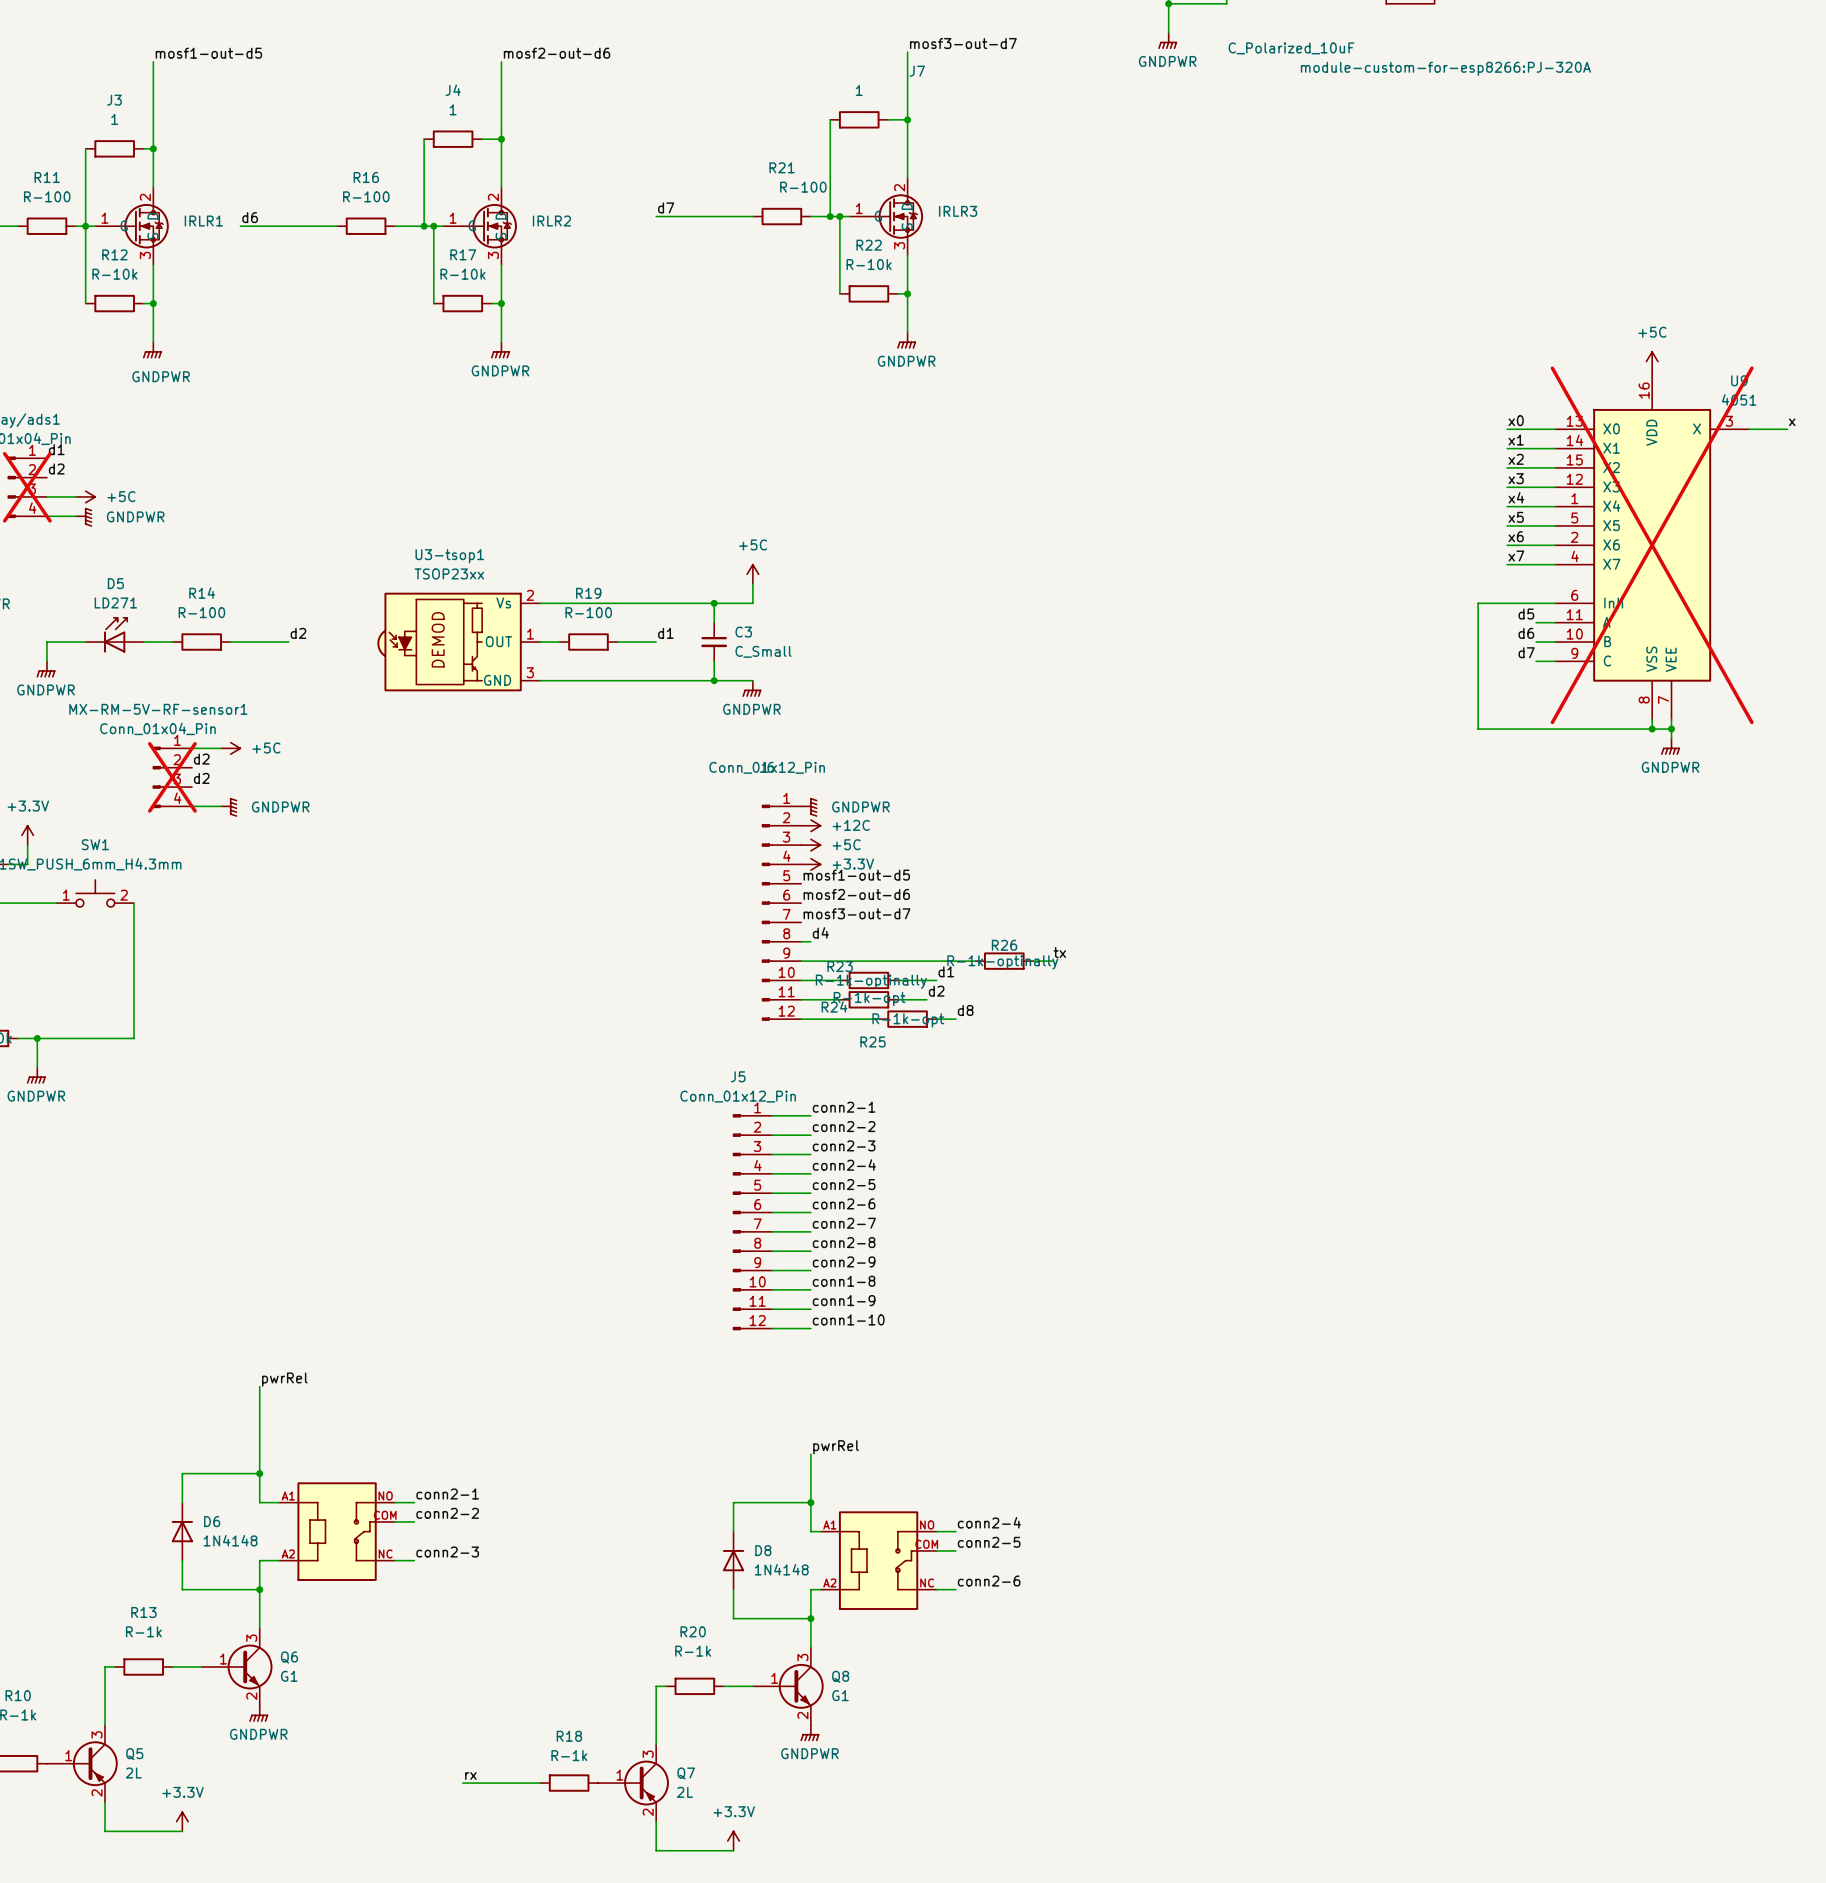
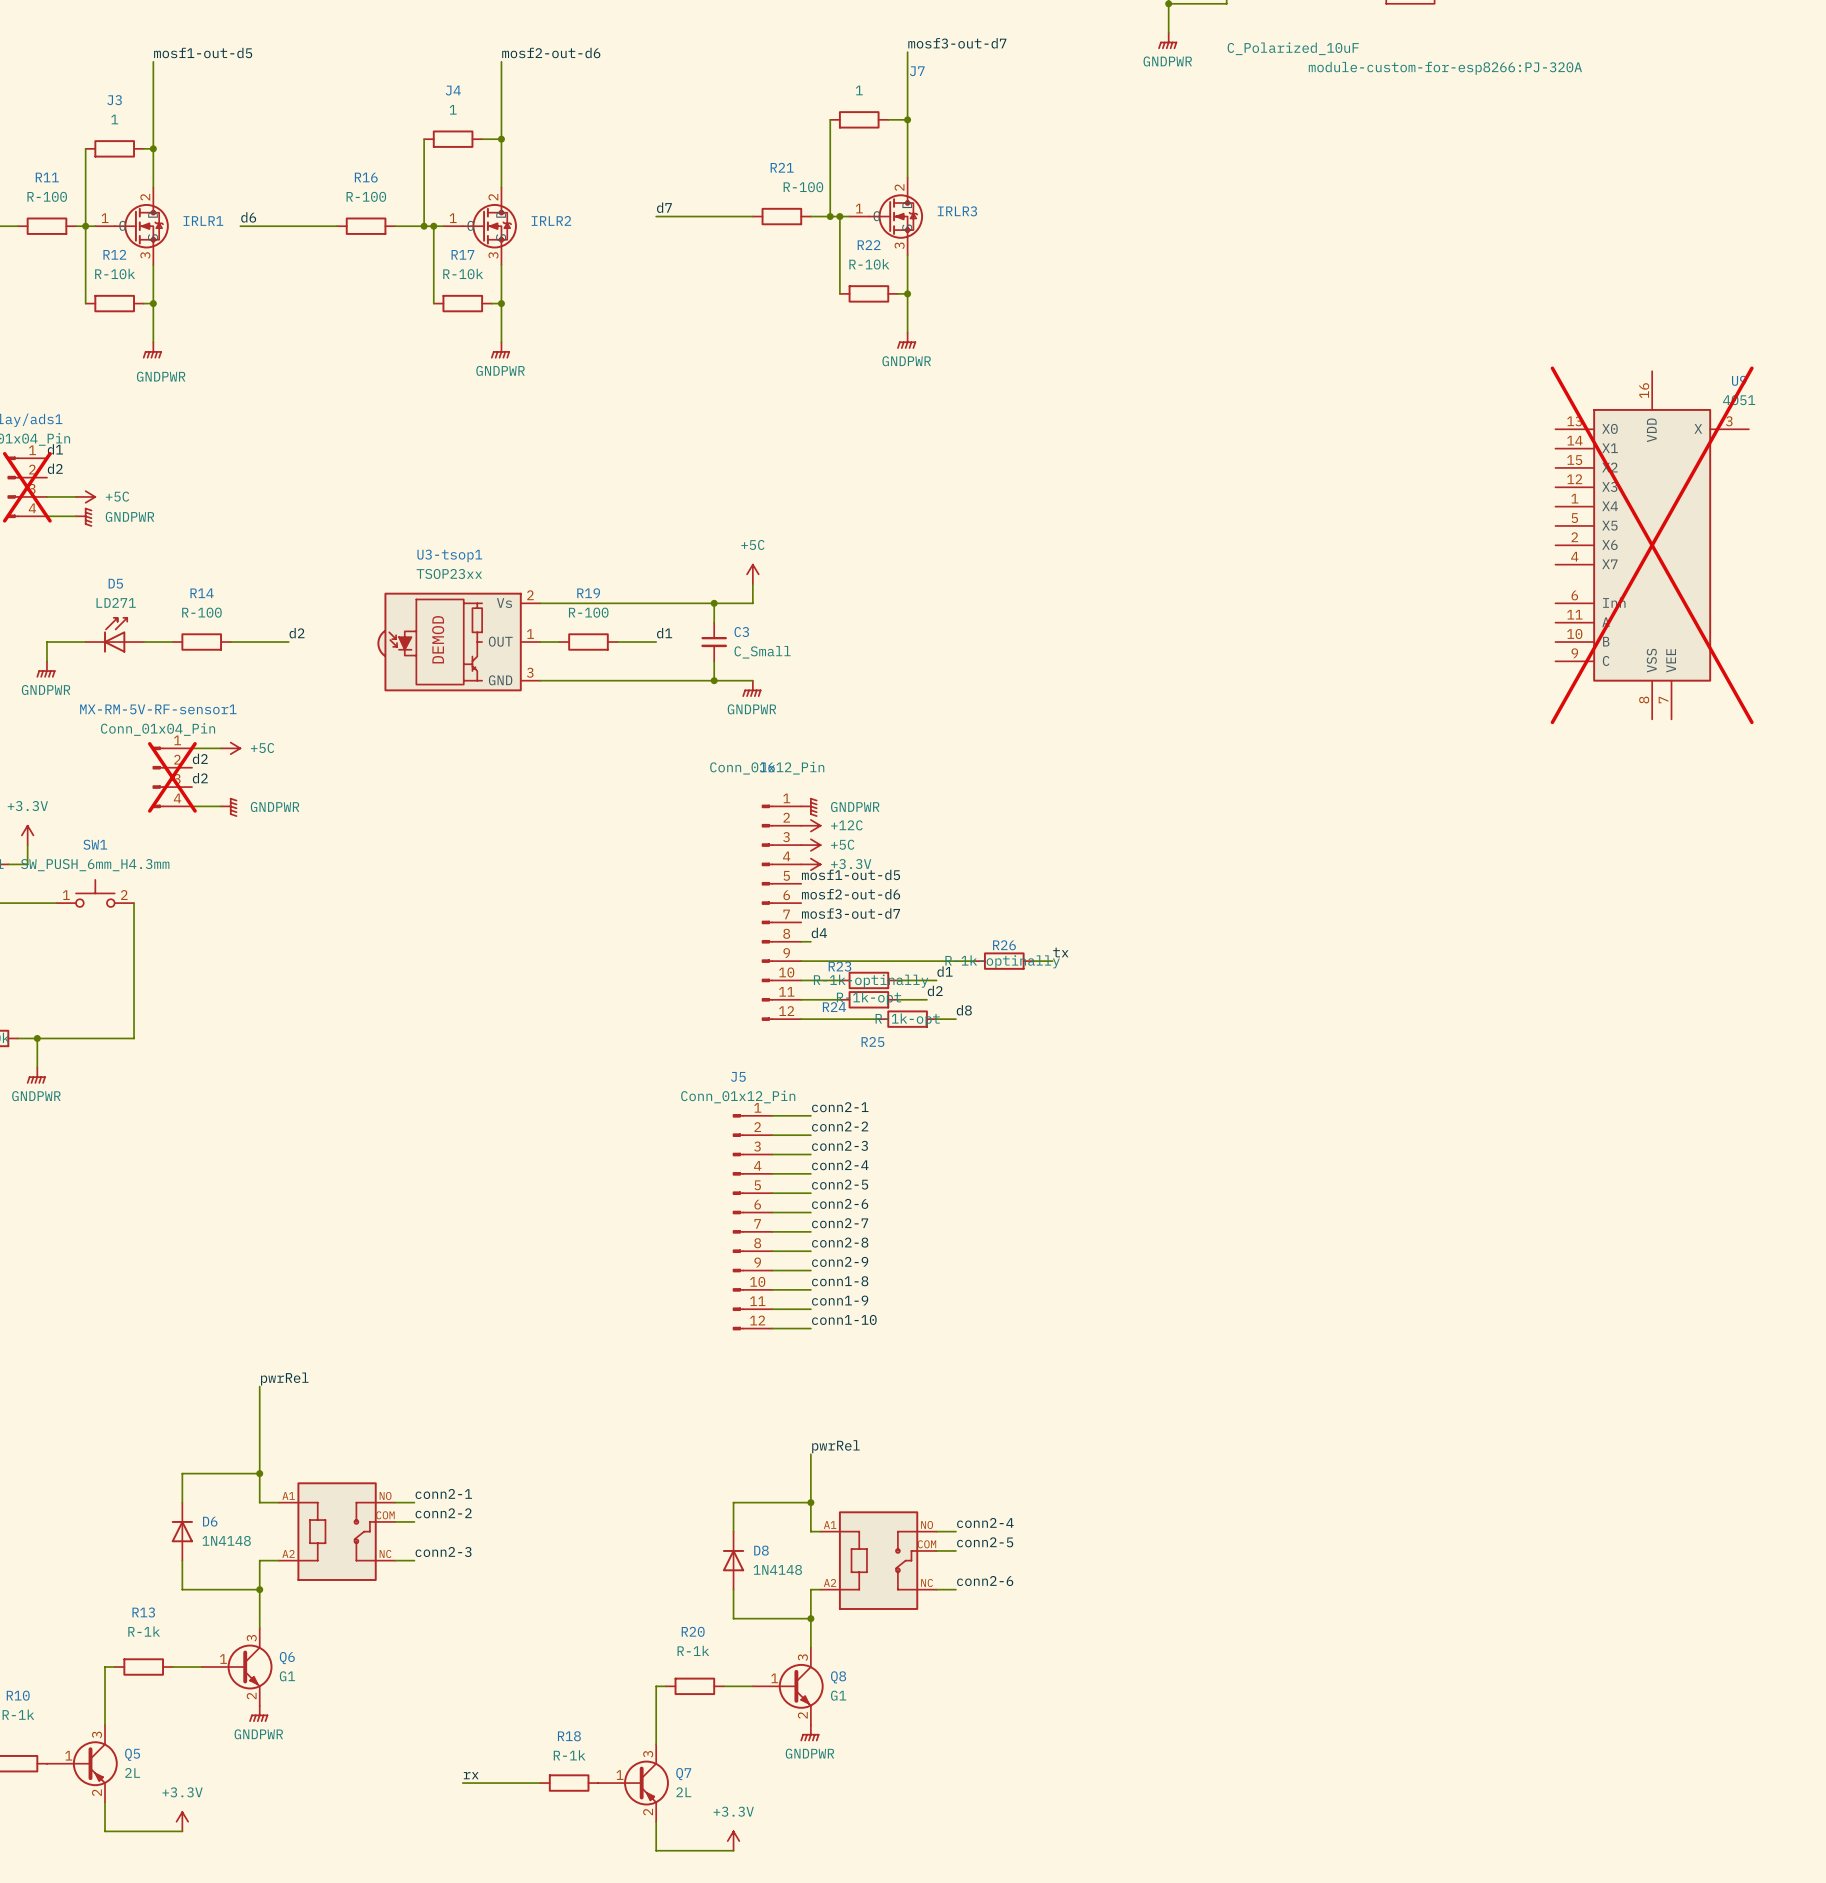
power symbol: +5C (1652, 361) -> none
label: x0 (1516, 420) -> none
label: x (1792, 422) -> none
wire: (1507, 429) (1555, 429) -> none
wire: (1748, 429) (1787, 429) -> none
label: x1 (1516, 439) -> none
wire: (1507, 448) (1555, 448) -> none
label: x2 (1516, 459) -> none
wire: (1507, 467) (1555, 467) -> none
label: x3 (1516, 478) -> none
wire: (1507, 487) (1555, 487) -> none
label: x4 (1516, 497) -> none
wire: (1507, 506) (1555, 506) -> none
label: x5 (1516, 517) -> none
wire: (1507, 525) (1555, 525) -> none
label: x6 (1516, 536) -> none
wire: (1507, 545) (1555, 545) -> none
label: x7 (1516, 556) -> none
wire: (1507, 564) (1555, 564) -> none
wire: (1555, 603) (1478, 603) (1478, 729) (1671, 729) -> none
label: d5 (1526, 614) -> none
wire: (1536, 622) (1555, 622) -> none
label: d6 (1526, 633) -> none
wire: (1536, 642) (1555, 642) -> none
label: d7 (1526, 652) -> none
wire: (1536, 661) (1555, 661) -> none
wire: (1652, 719) (1652, 729) -> none
wire: (1671, 719) (1671, 738) -> none
junction: (1652, 729) -> none
junction: (1671, 729) -> none
power symbol: GNDPWR (1670, 746) -> none

